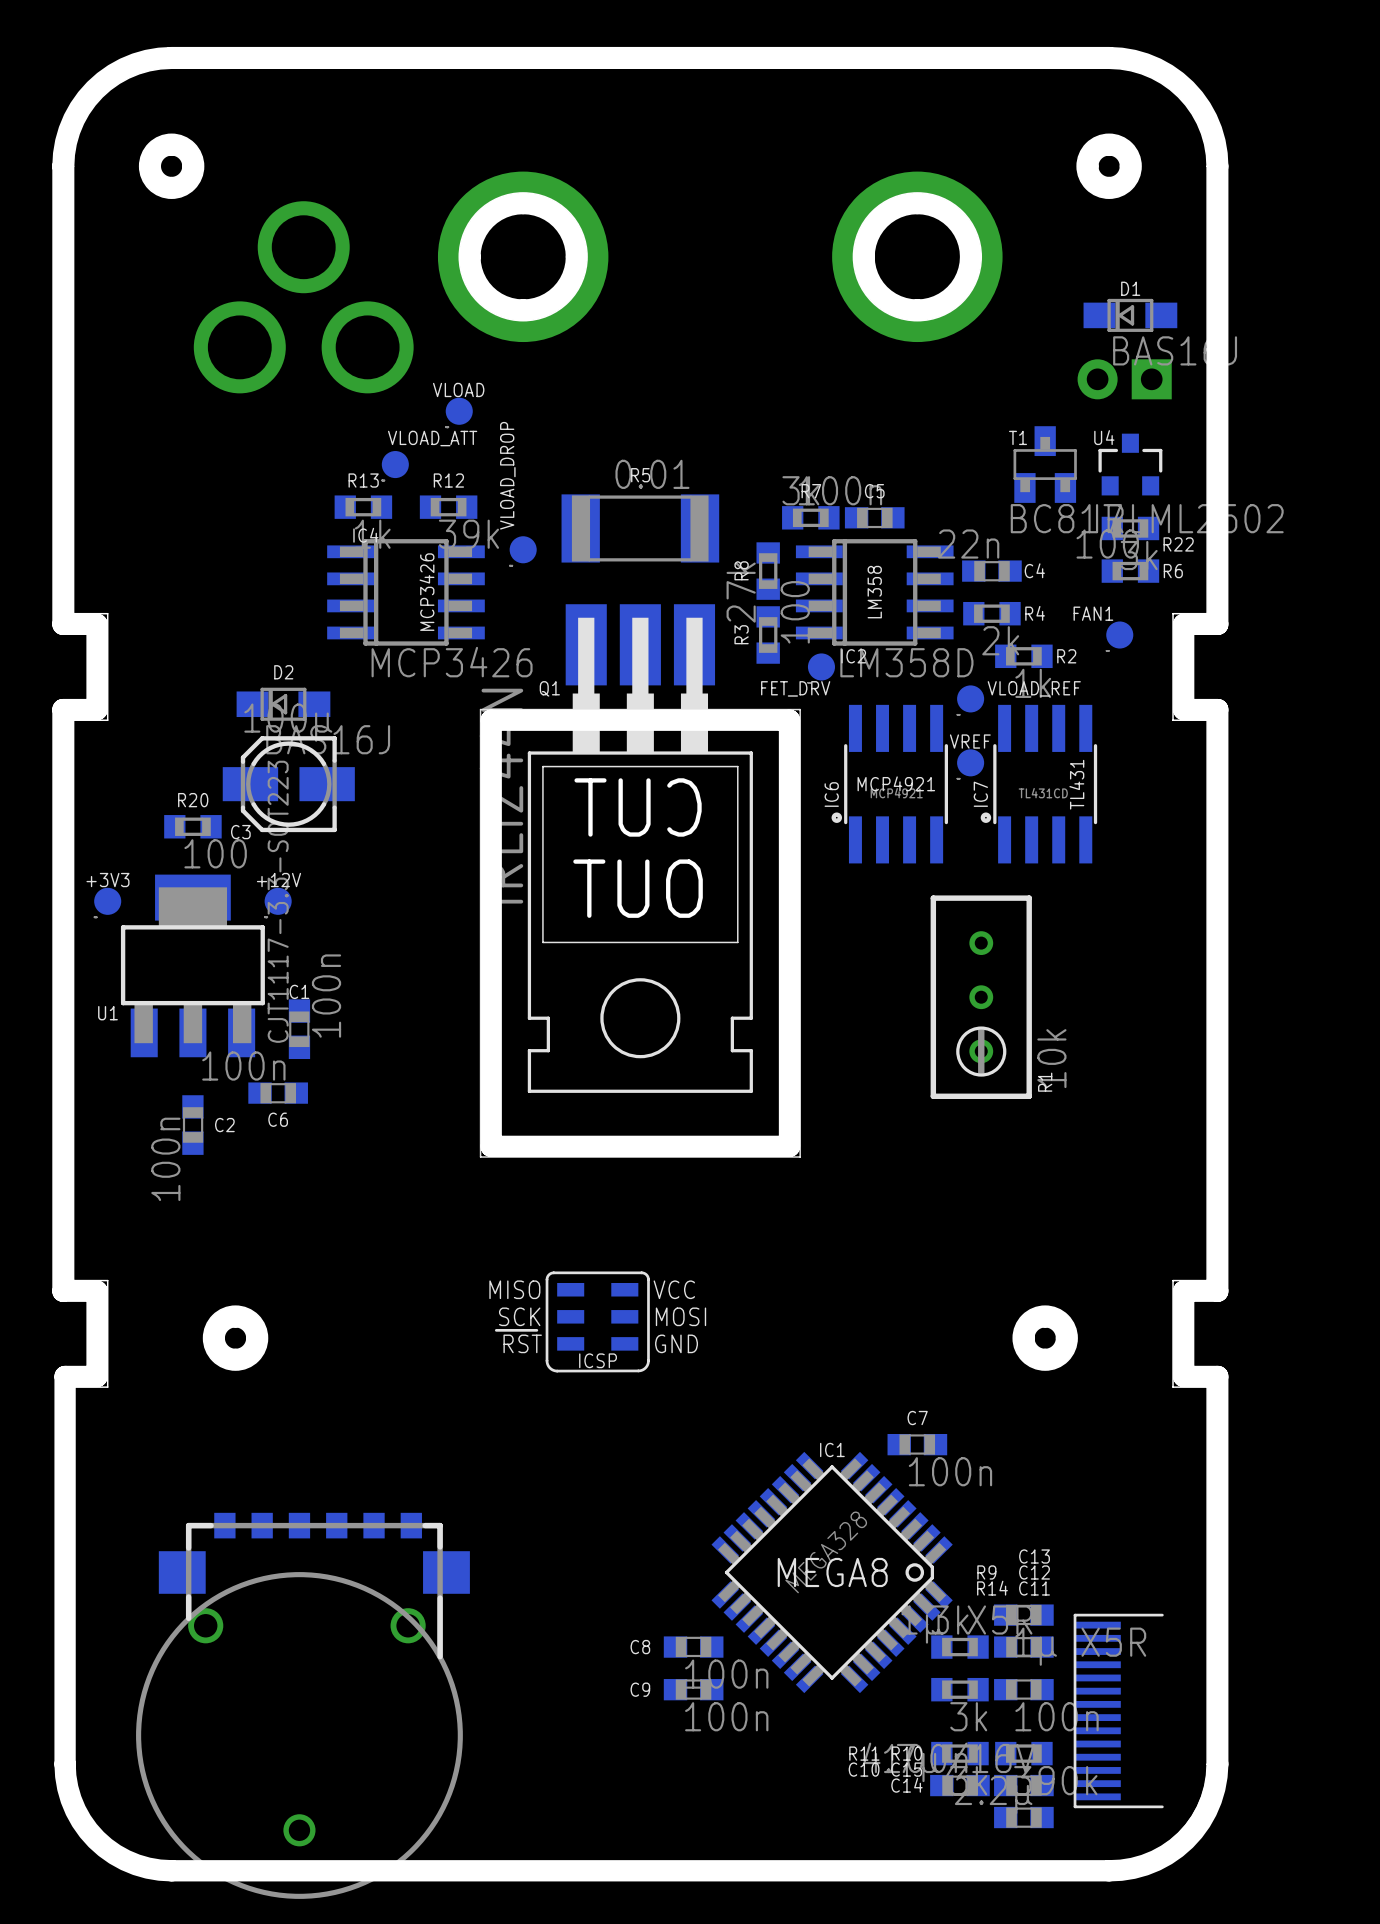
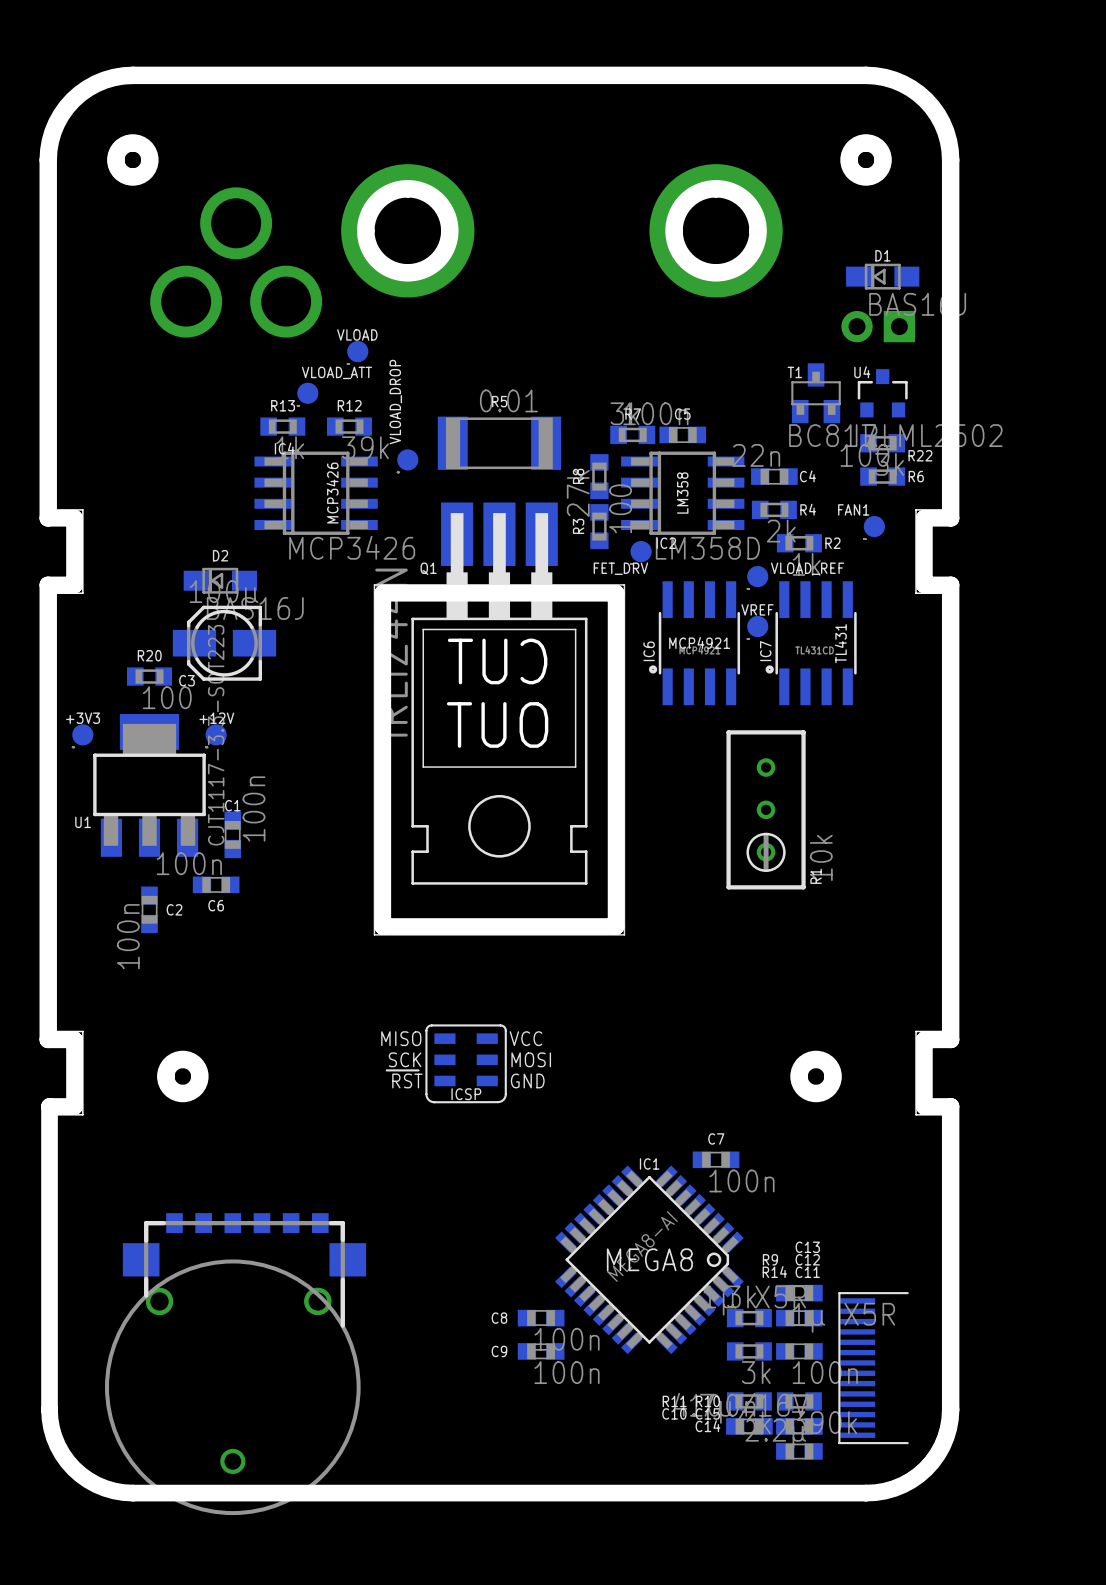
IC1 value: MEGA328 (826, 1552) -> MEGA8-AI (642, 1246)

